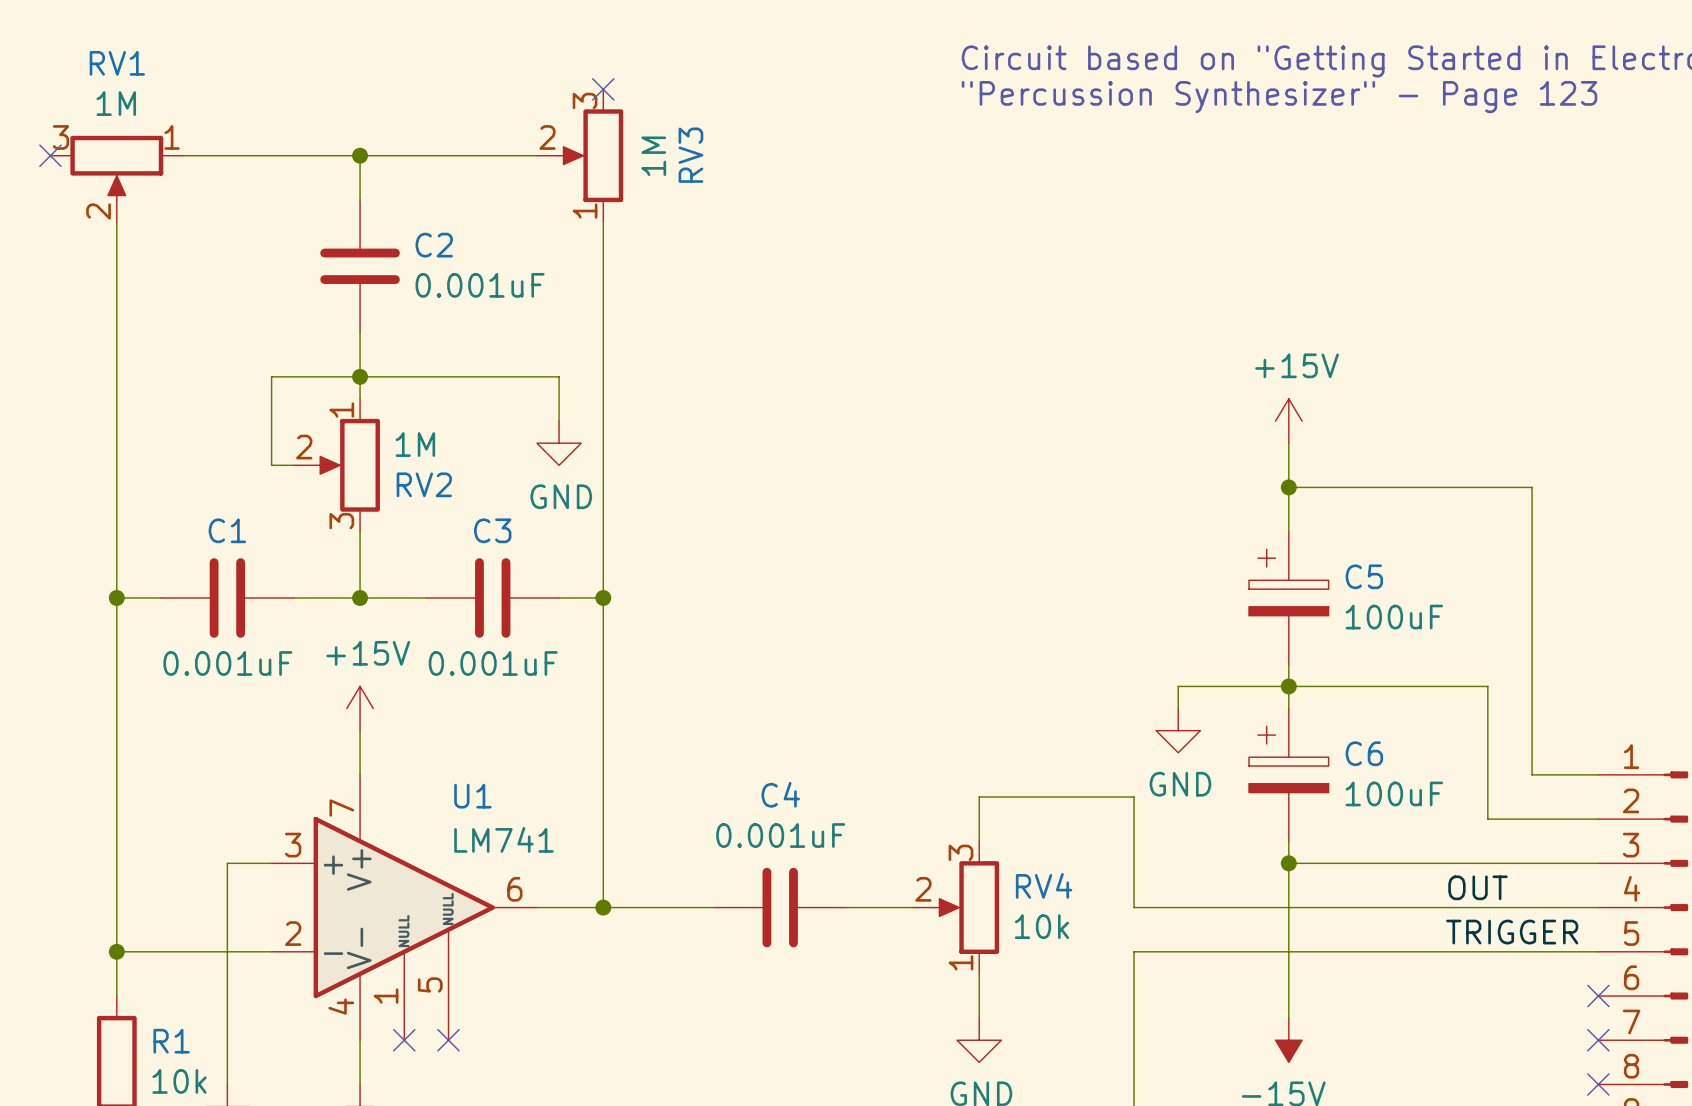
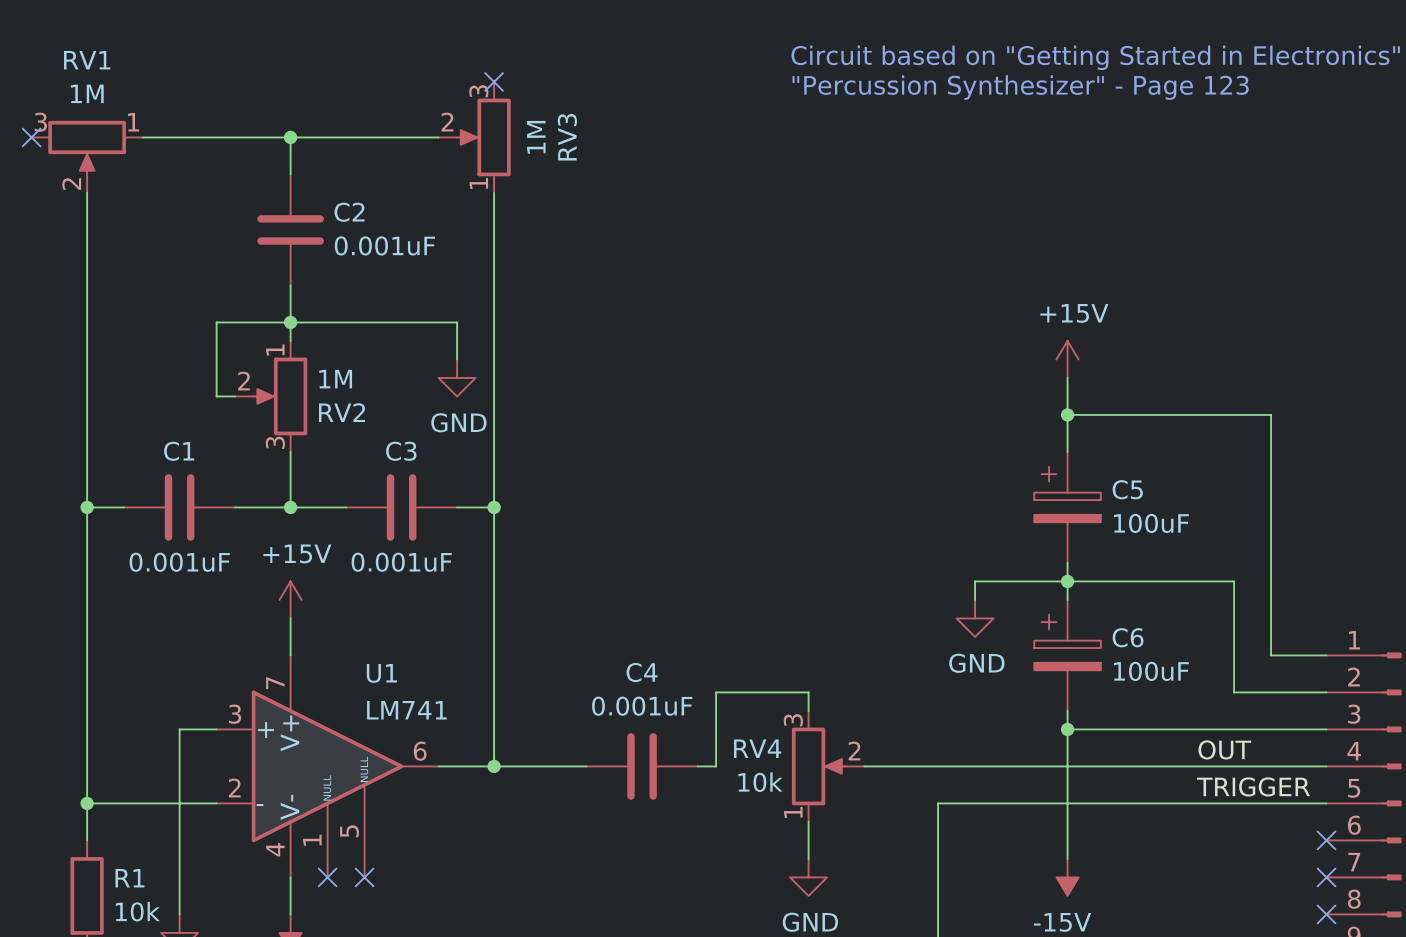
wire: (979, 819) (979, 797) (1134, 797) (1134, 907) -> (864, 766) (938, 766)
wire: (868, 907) (912, 907) -> (716, 766) (716, 692) (808, 692)
RV4 flip: as is (967, 907) -> left-right (818, 766)

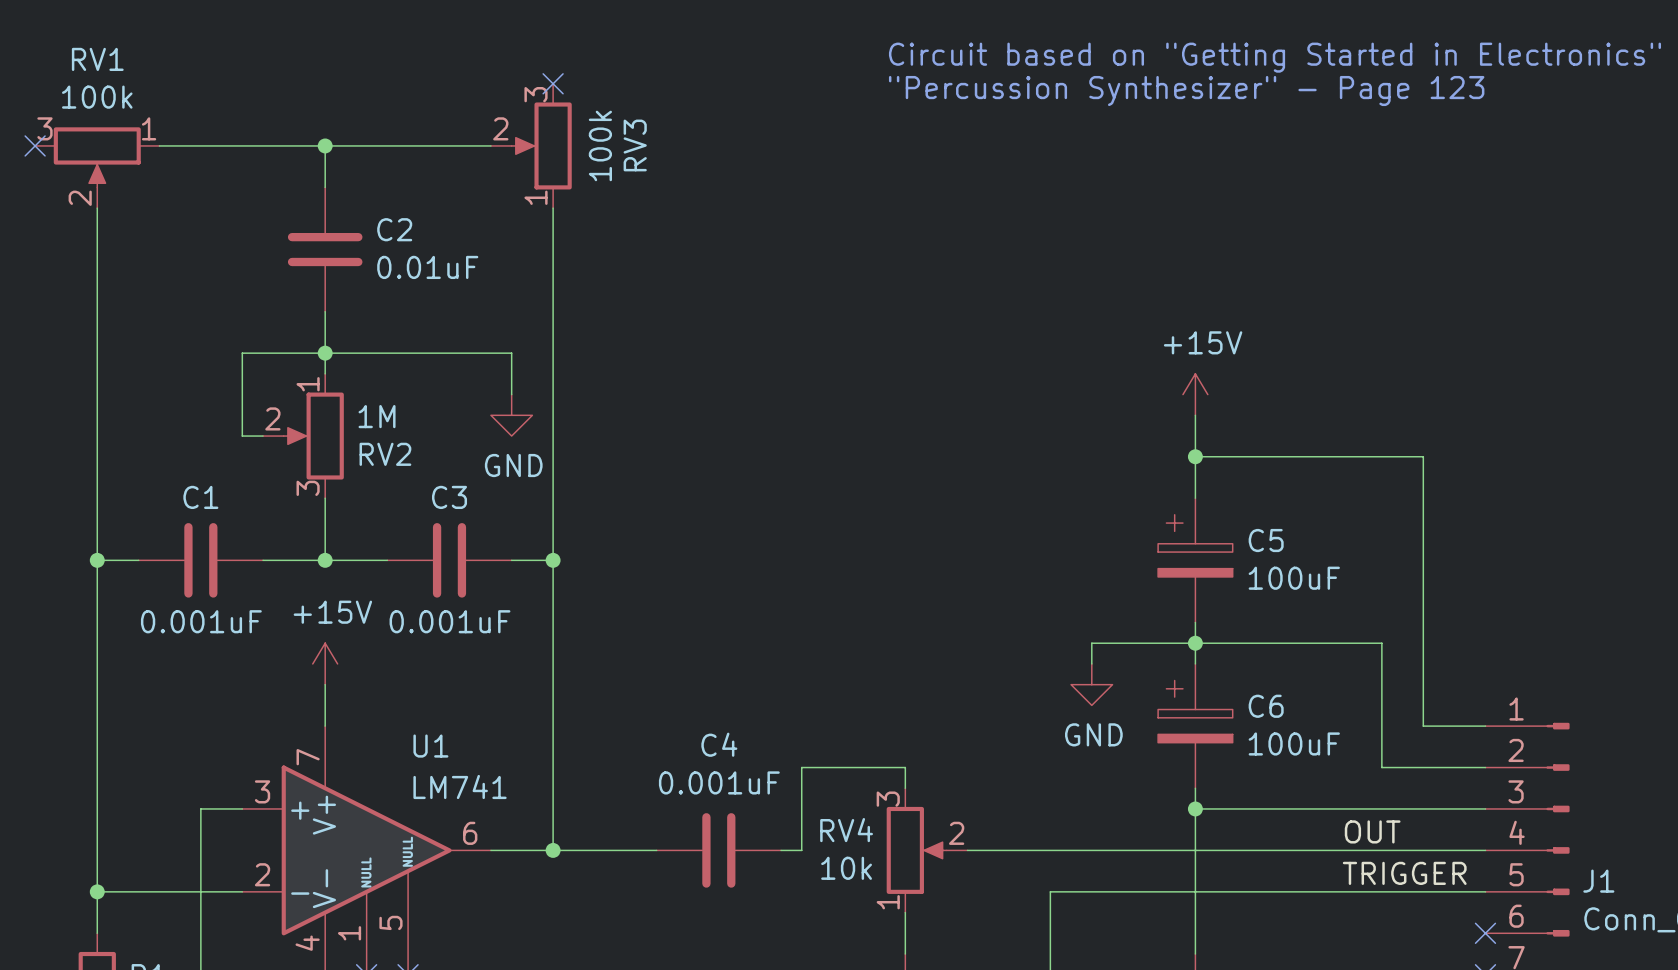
RV1 value: 1M (87, 93) -> 100k (97, 97)
RV3 value: 1M (536, 137) -> 100k (600, 145)
C2 value: 0.001uF (384, 245) -> 0.01uF (427, 267)

